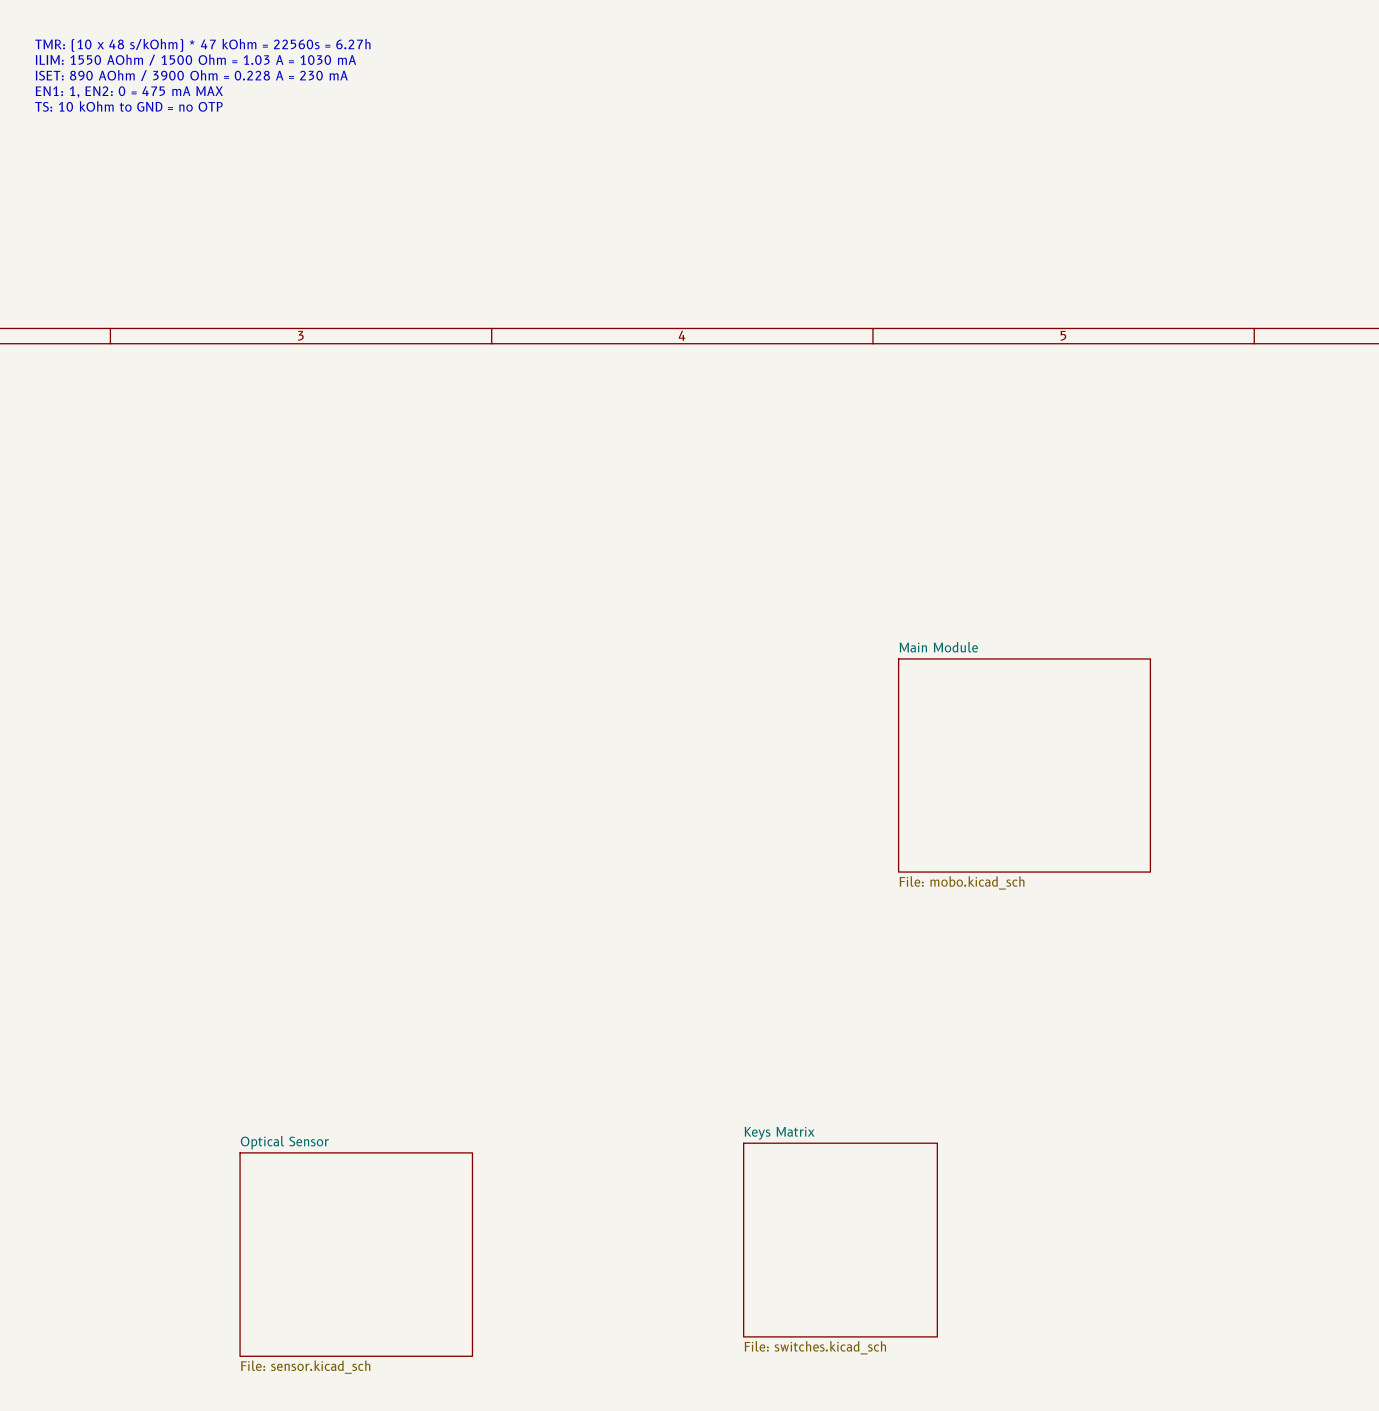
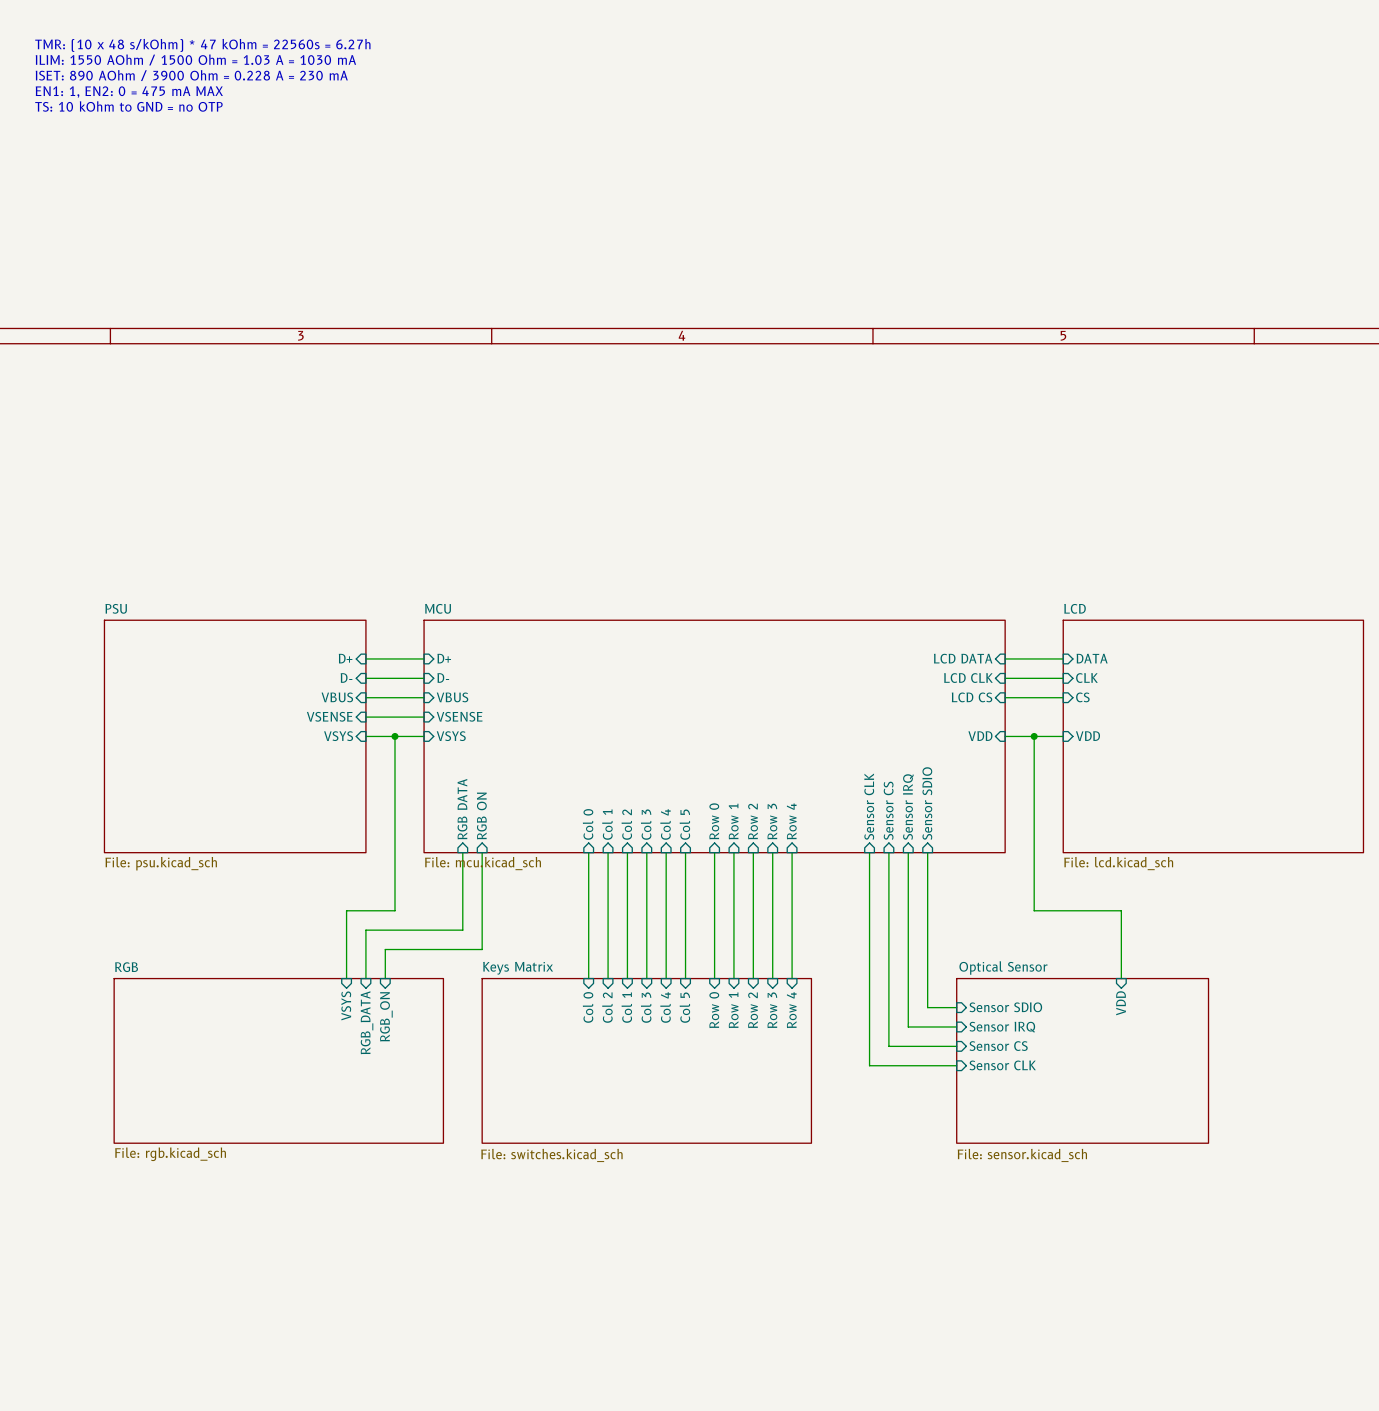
sheet pin: none -> D+ (345, 658)
wire: none -> (365, 658) (424, 658)
sheet pin: none -> D+ (444, 658)
sheet pin: none -> LCD DATA (963, 658)
sheet pin: none -> DATA (1092, 658)
sheet pin: none -> D- (346, 678)
wire: none -> (365, 678) (424, 678)
sheet pin: none -> D- (443, 678)
sheet pin: none -> LCD CLK (968, 678)
wire: none -> (1005, 678) (1063, 678)
sheet pin: none -> CLK (1086, 678)
sheet pin: none -> VBUS (337, 697)
wire: none -> (365, 697) (424, 697)
sheet pin: none -> VBUS (452, 697)
sheet pin: none -> LCD CS (972, 697)
wire: none -> (1005, 697) (1063, 697)
sheet pin: none -> CS (1082, 697)
sheet pin: none -> VSENSE (329, 716)
sheet pin: none -> VSENSE (459, 716)
wire: none -> (365, 717) (424, 717)
sheet PSU: none -> File: psu.kicad_sch (235, 736)
sheet pin: none -> VSYS (338, 736)
wire: none -> (365, 736) (424, 736)
wire: none -> (394, 736) (394, 910) (346, 910) (346, 978)
junction: none -> (394, 736)
sheet pin: none -> VSYS (451, 736)
sheet MCU: none -> File: mcu.kicad_sch (714, 736)
sheet pin: none -> VDD (980, 736)
wire: none -> (1005, 736) (1063, 736)
wire: none -> (1034, 736) (1034, 910) (1121, 910) (1121, 978)
junction: none -> (1034, 736)
sheet pin: none -> VDD (1087, 736)
sheet LCD: none -> File: lcd.kicad_sch (1213, 736)
sheet Main Module: File: mobo.kicad_sch (1024, 765) -> none
sheet pin: none -> Sensor SDIO (927, 803)
sheet pin: none -> Sensor CLK (869, 806)
sheet pin: none -> Sensor IRQ (908, 807)
sheet pin: none -> RGB DATA (462, 809)
sheet pin: none -> Sensor CS (888, 810)
sheet pin: none -> RGB ON (481, 815)
sheet pin: none -> Row 0 (714, 821)
sheet pin: none -> Row 1 (733, 821)
sheet pin: none -> Row 2 (753, 821)
sheet pin: none -> Row 3 (772, 821)
sheet pin: none -> Row 4 (791, 821)
sheet pin: none -> Col 0 (588, 824)
sheet pin: none -> Col 1 (607, 824)
sheet pin: none -> Col 2 (626, 824)
sheet pin: none -> Col 3 (646, 824)
sheet pin: none -> Col 4 (665, 824)
sheet pin: none -> Col 5 (684, 824)
wire: none -> (462, 852) (462, 930) (365, 930) (365, 978)
wire: none -> (482, 852) (482, 949) (385, 949) (385, 978)
wire: none -> (588, 852) (588, 978)
wire: none -> (608, 852) (608, 978)
wire: none -> (627, 852) (627, 978)
wire: none -> (646, 852) (646, 978)
wire: none -> (666, 852) (666, 978)
wire: none -> (685, 852) (685, 978)
wire: none -> (714, 852) (714, 978)
wire: none -> (733, 852) (733, 978)
wire: none -> (753, 852) (753, 978)
wire: none -> (772, 852) (772, 978)
wire: none -> (792, 852) (792, 978)
wire: none -> (869, 852) (869, 1065) (956, 1065)
wire: none -> (888, 852) (888, 1046) (956, 1046)
wire: none -> (908, 852) (908, 1026) (956, 1026)
wire: none -> (927, 852) (927, 1007) (956, 1007)
sheet pin: none -> VDD (1121, 1003)
sheet pin: none -> VSYS (346, 1005)
sheet pin: none -> Col 0 (588, 1007)
sheet pin: none -> Col 2 (607, 1007)
sheet pin: none -> Col 1 (626, 1007)
sheet pin: none -> Col 3 (646, 1007)
sheet pin: none -> Col 4 (665, 1007)
sheet pin: none -> Col 5 (684, 1007)
sheet pin: none -> Sensor SDIO (1005, 1007)
sheet pin: none -> Row 0 (714, 1010)
sheet pin: none -> Row 1 (733, 1010)
sheet pin: none -> Row 2 (753, 1010)
sheet pin: none -> Row 3 (772, 1010)
sheet pin: none -> Row 4 (791, 1010)
sheet pin: none -> RGB_ON (386, 1016)
sheet pin: none -> RGB_DATA (367, 1022)
sheet pin: none -> Sensor IRQ (1002, 1027)
sheet pin: none -> Sensor CS (998, 1046)
sheet RGB: none -> File: rgb.kicad_sch (278, 1060)
sheet Keys Matrix: none -> File: switches.kicad_sch (646, 1060)
sheet Optical Sensor: none -> File: sensor.kicad_sch (1082, 1060)
sheet pin: none -> Sensor CLK (1002, 1065)
sheet Keys Matrix: File: switches.kicad_sch (840, 1240) -> none
sheet Optical Sensor: File: sensor.kicad_sch (356, 1254) -> none

